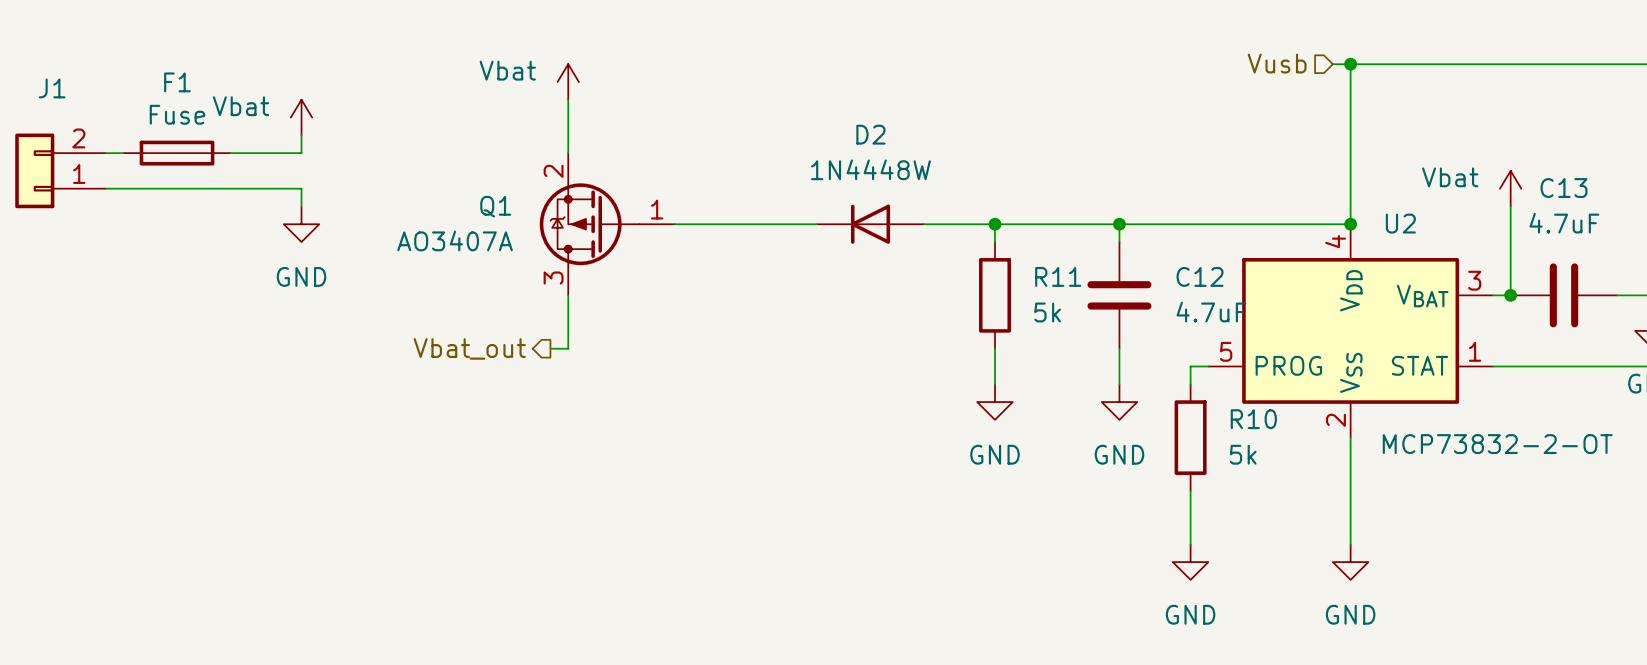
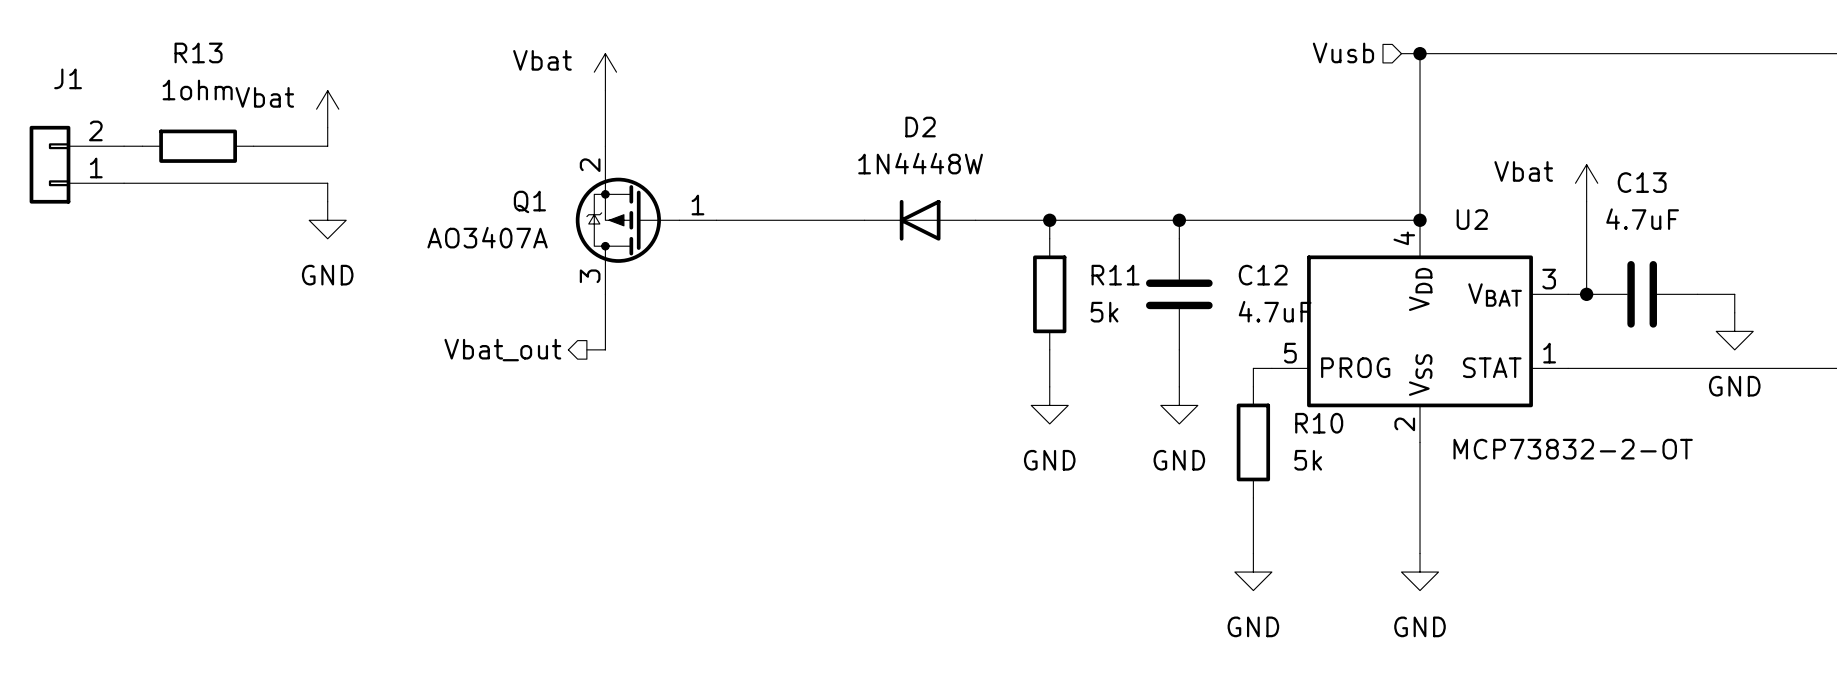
F1: Fuse (177, 153) -> none
R13: none -> 1ohm (198, 146)

